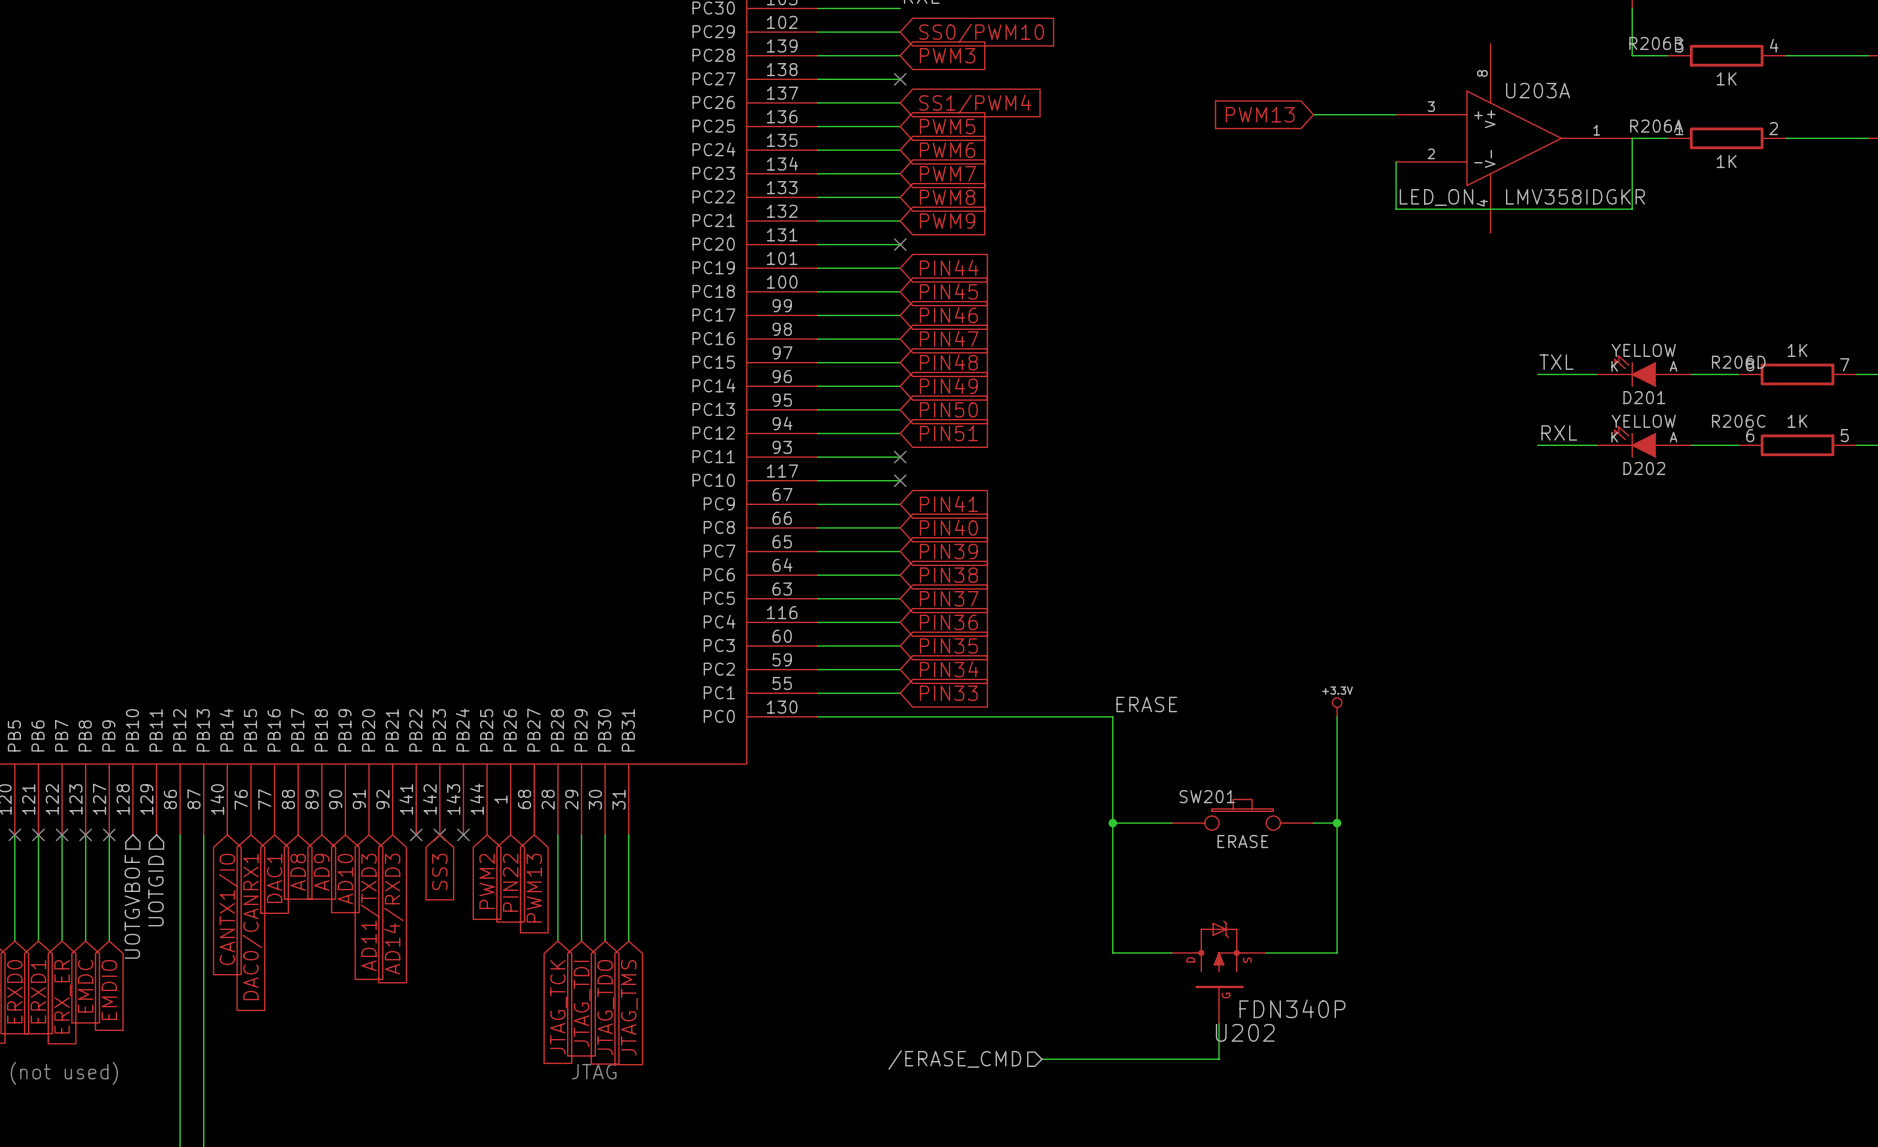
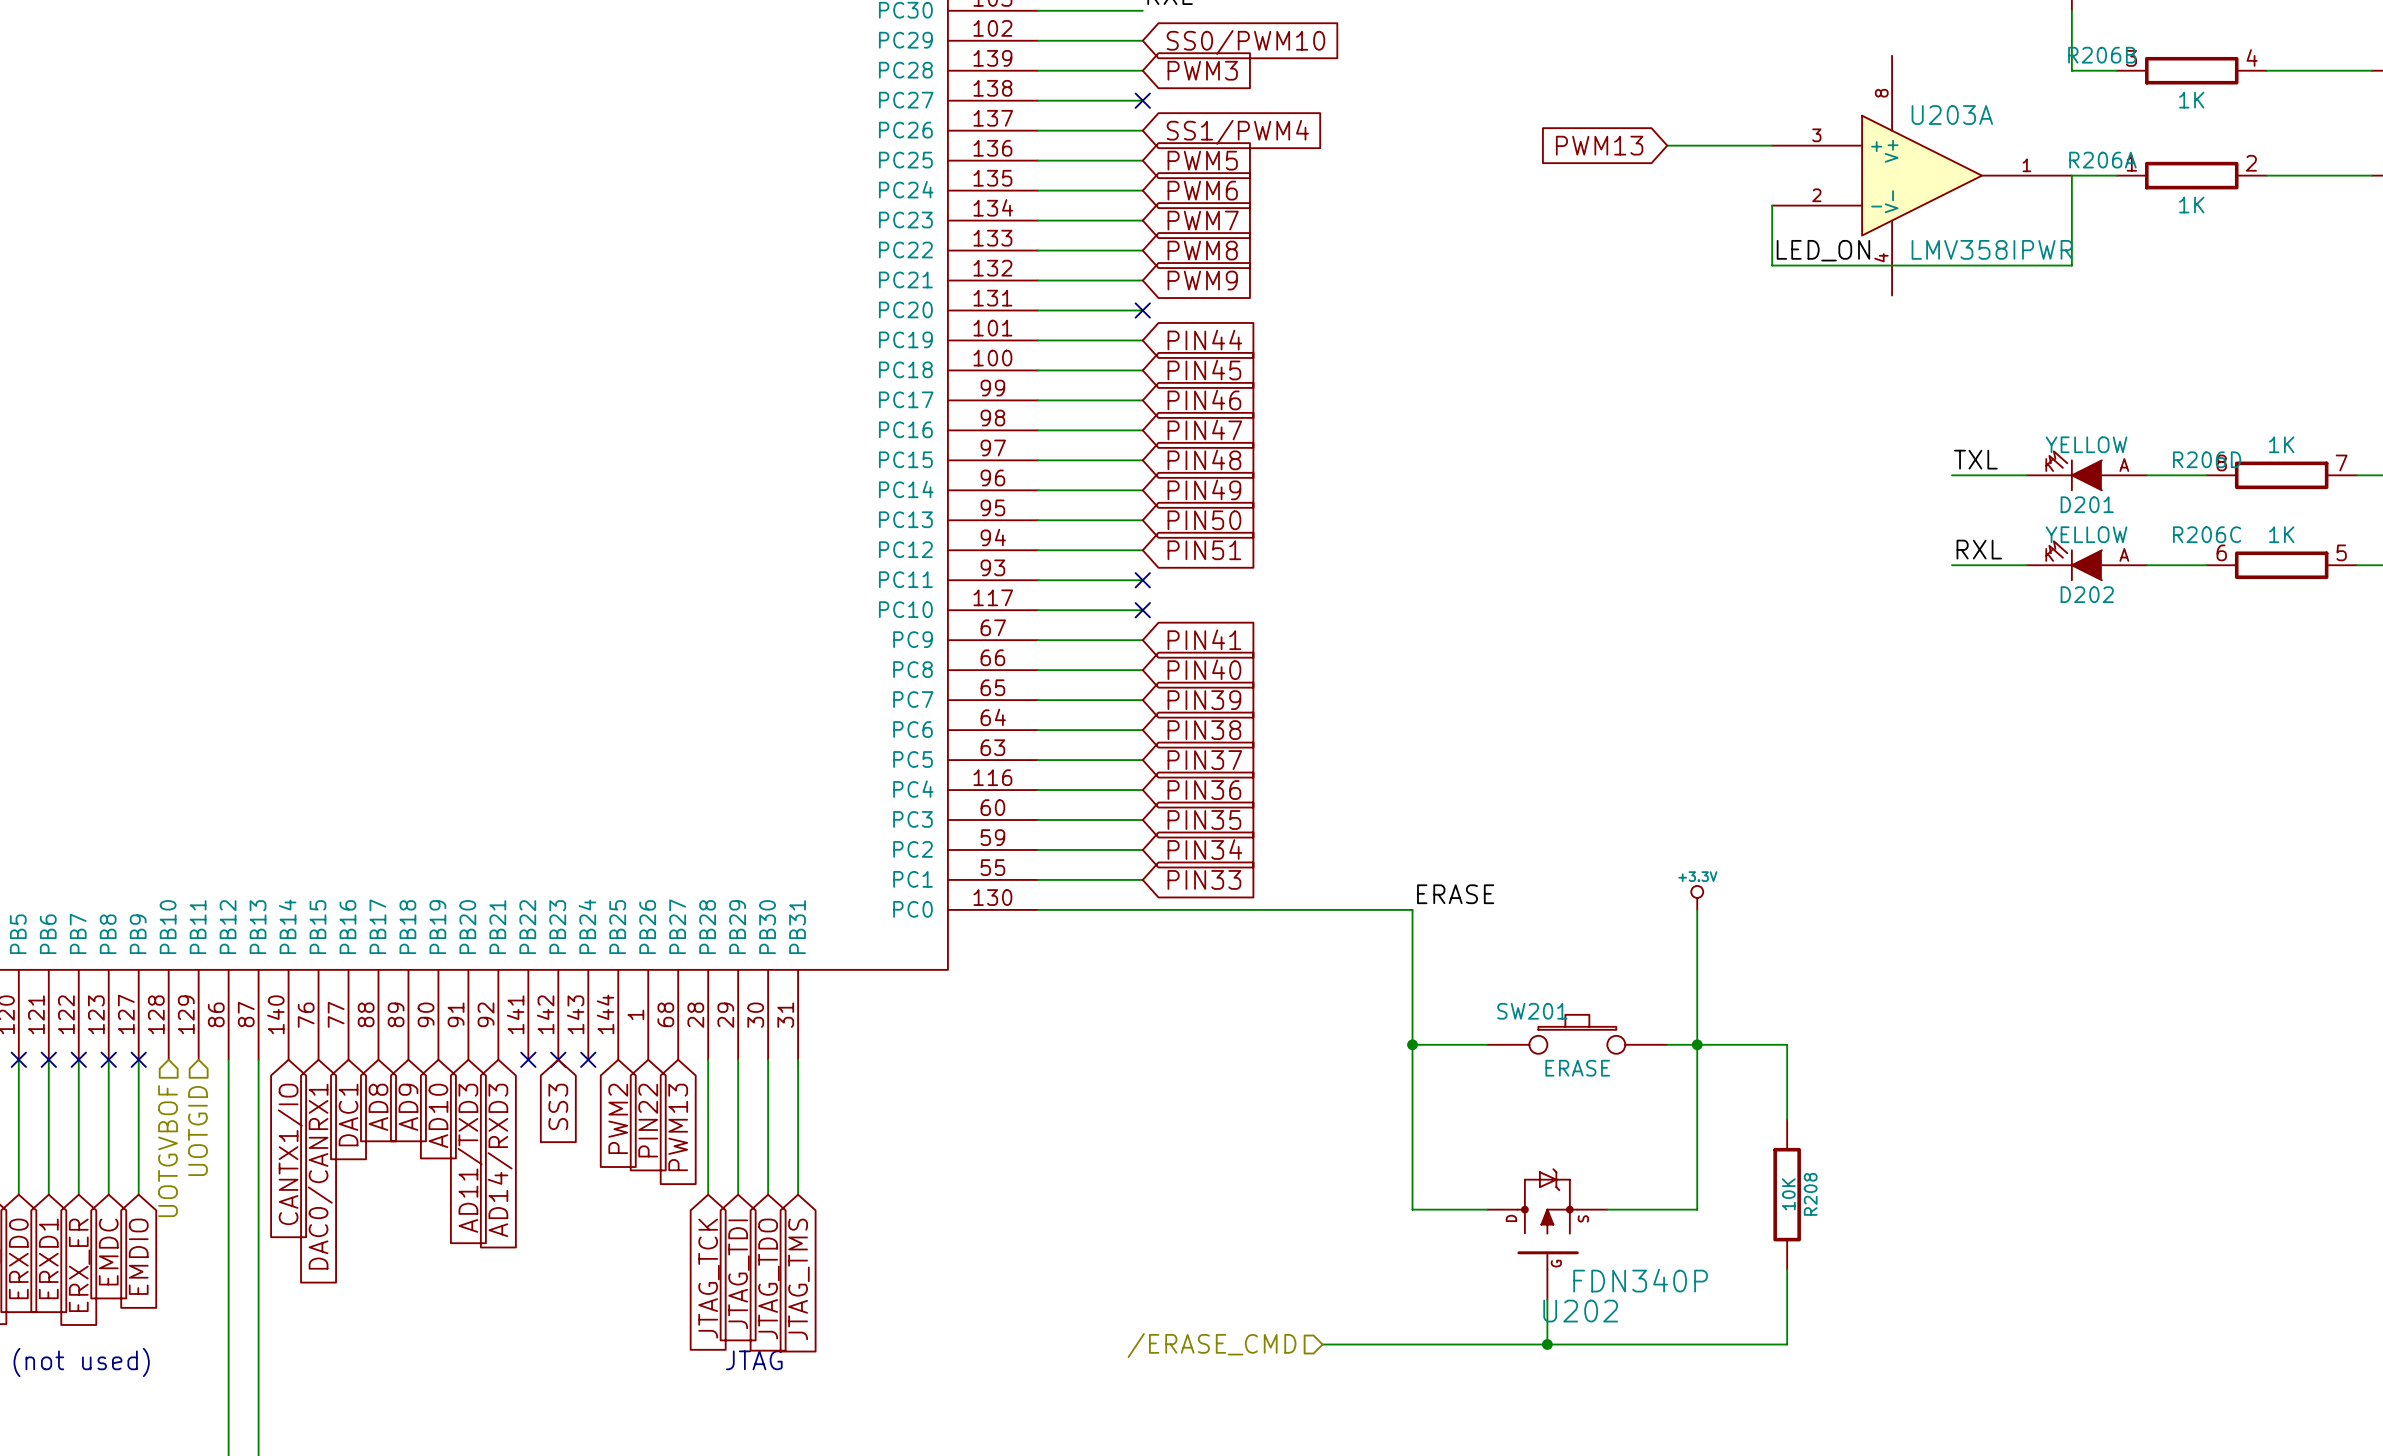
U203A value: LMV358IDGKR (1575, 196) -> LMV358IPWR (1992, 249)
wire: none -> (1697, 1044) (1787, 1044) (1787, 1119)
R208: none -> 10K (1787, 1194)
wire: none -> (1787, 1269) (1787, 1344) (1547, 1344)
junction: none -> (1547, 1344)

